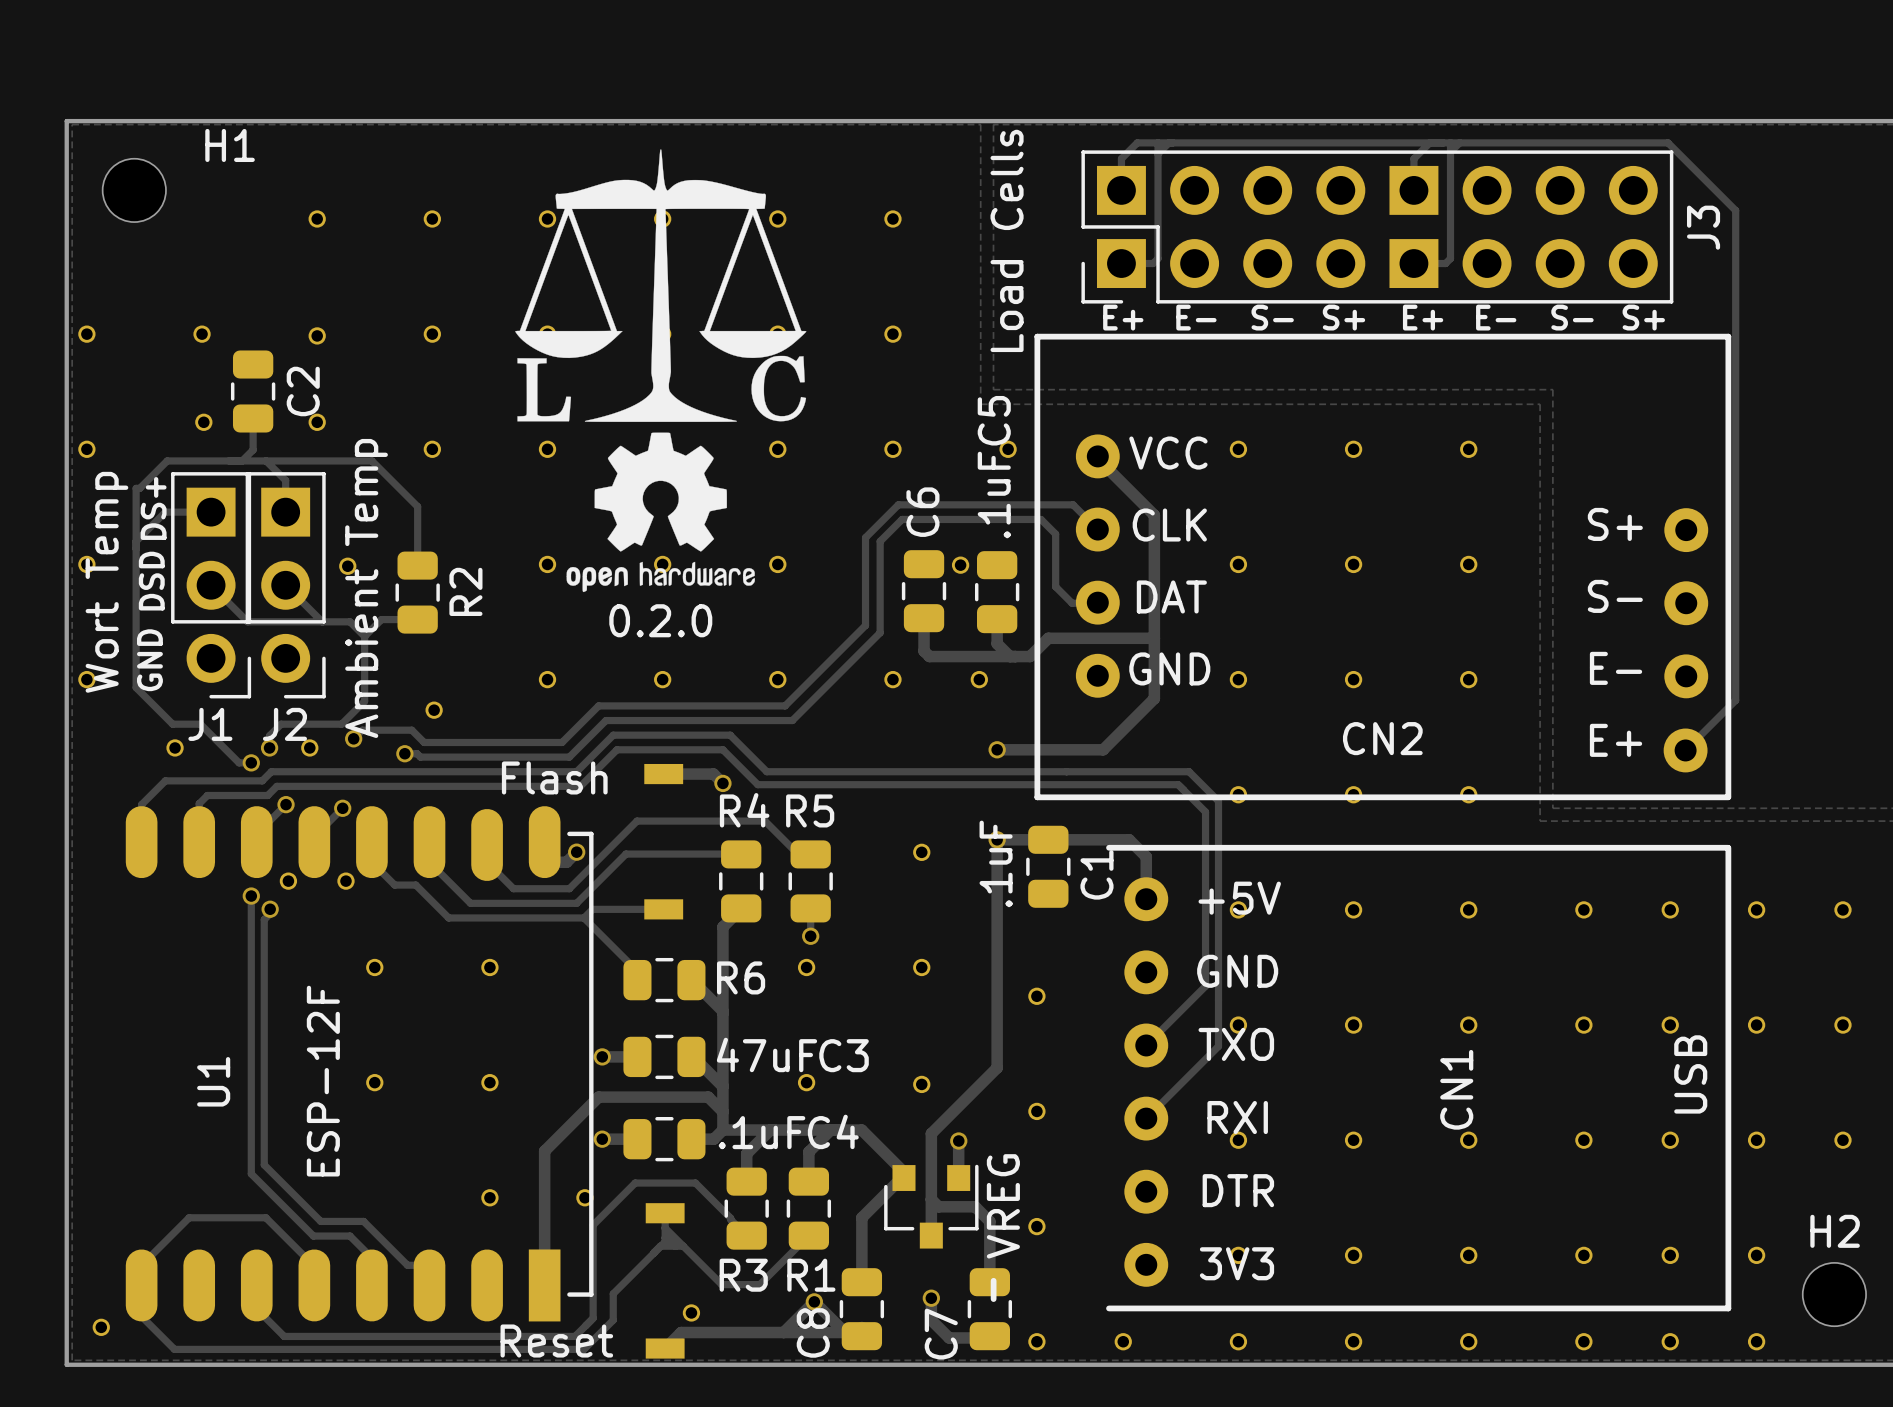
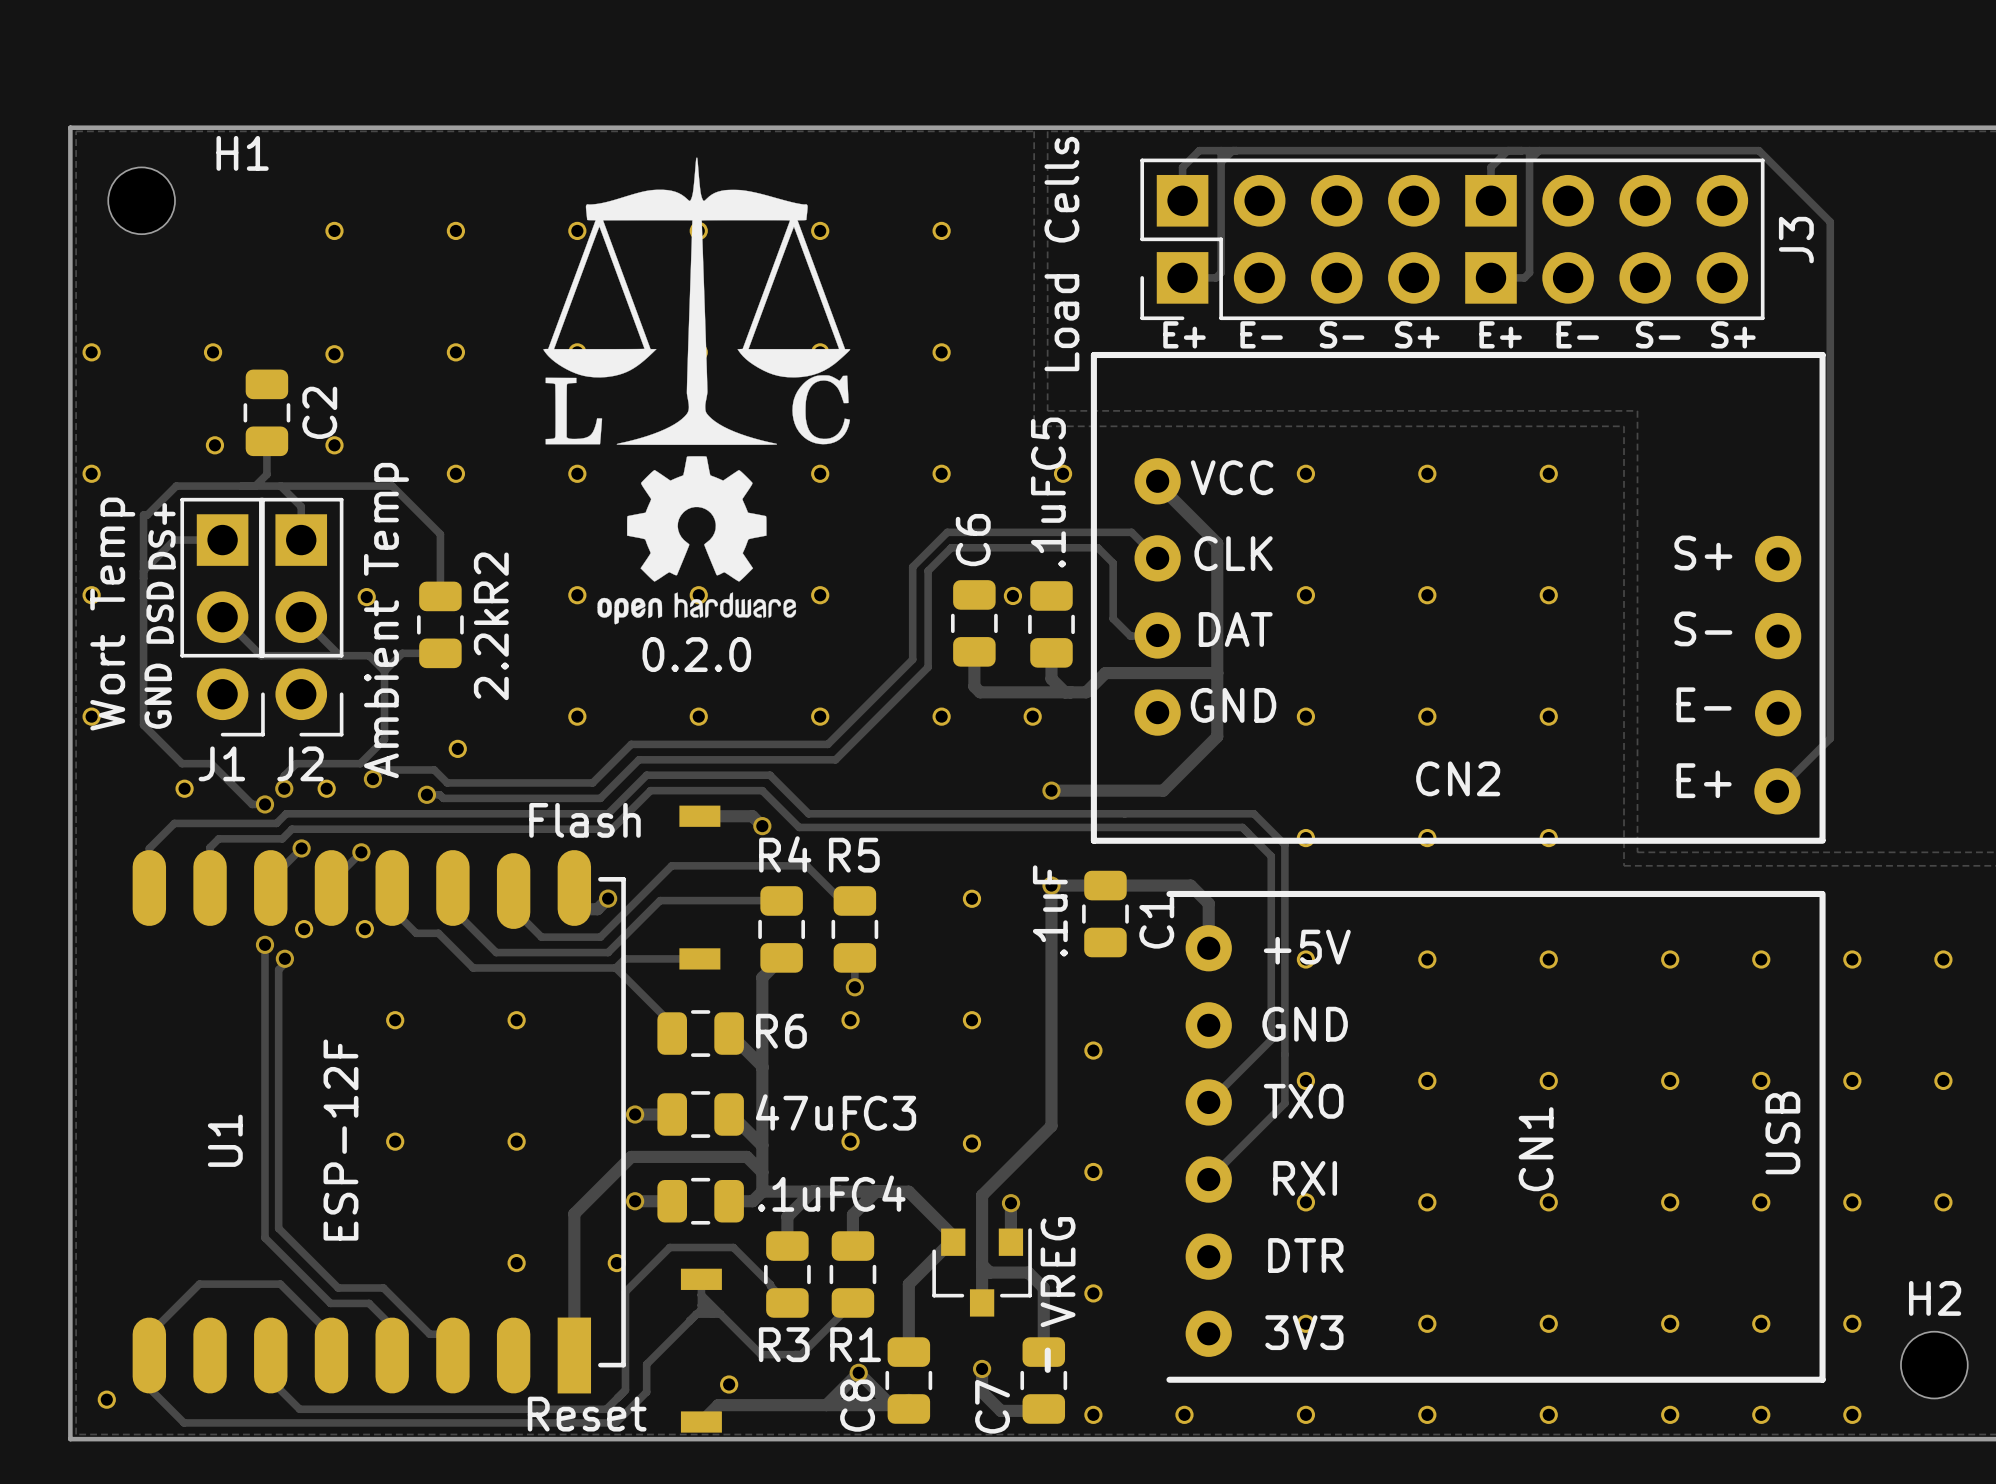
R2 name position: R2 (465, 591) -> R2 (491, 577)
R2 value: none -> 2.2k (491, 654)

